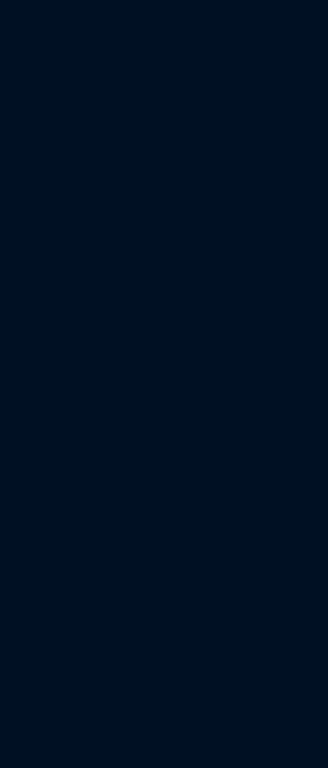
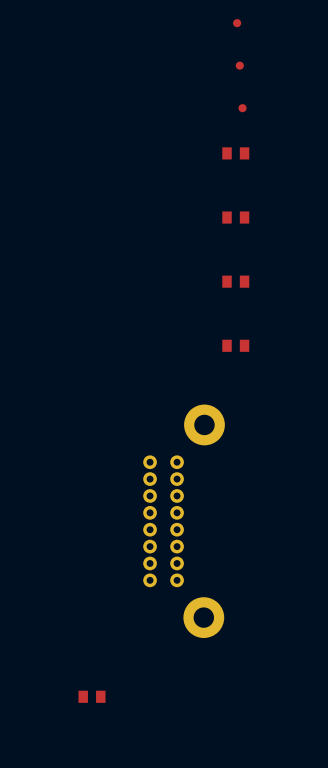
part: none -> (237, 23)
part: none -> (239, 65)
part: none -> (242, 108)
part: none -> (235, 153)
part: none -> (235, 217)
part: none -> (235, 281)
part: none -> (235, 345)
part: none -> (184, 521)
part: none -> (92, 696)

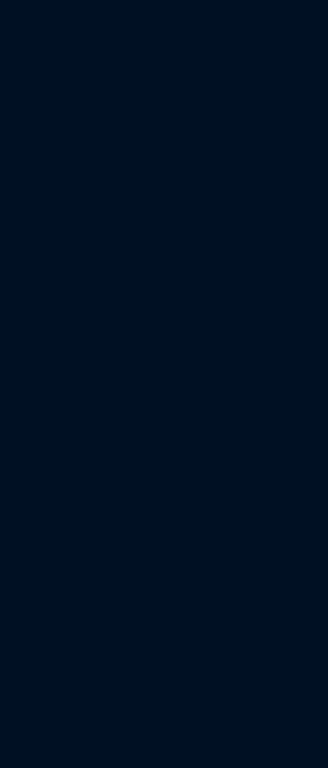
part: (237, 23) -> none
part: (239, 65) -> none
part: (242, 108) -> none
part: (235, 153) -> none
part: (235, 217) -> none
part: (235, 281) -> none
part: (235, 345) -> none
part: (184, 521) -> none
part: (92, 696) -> none

